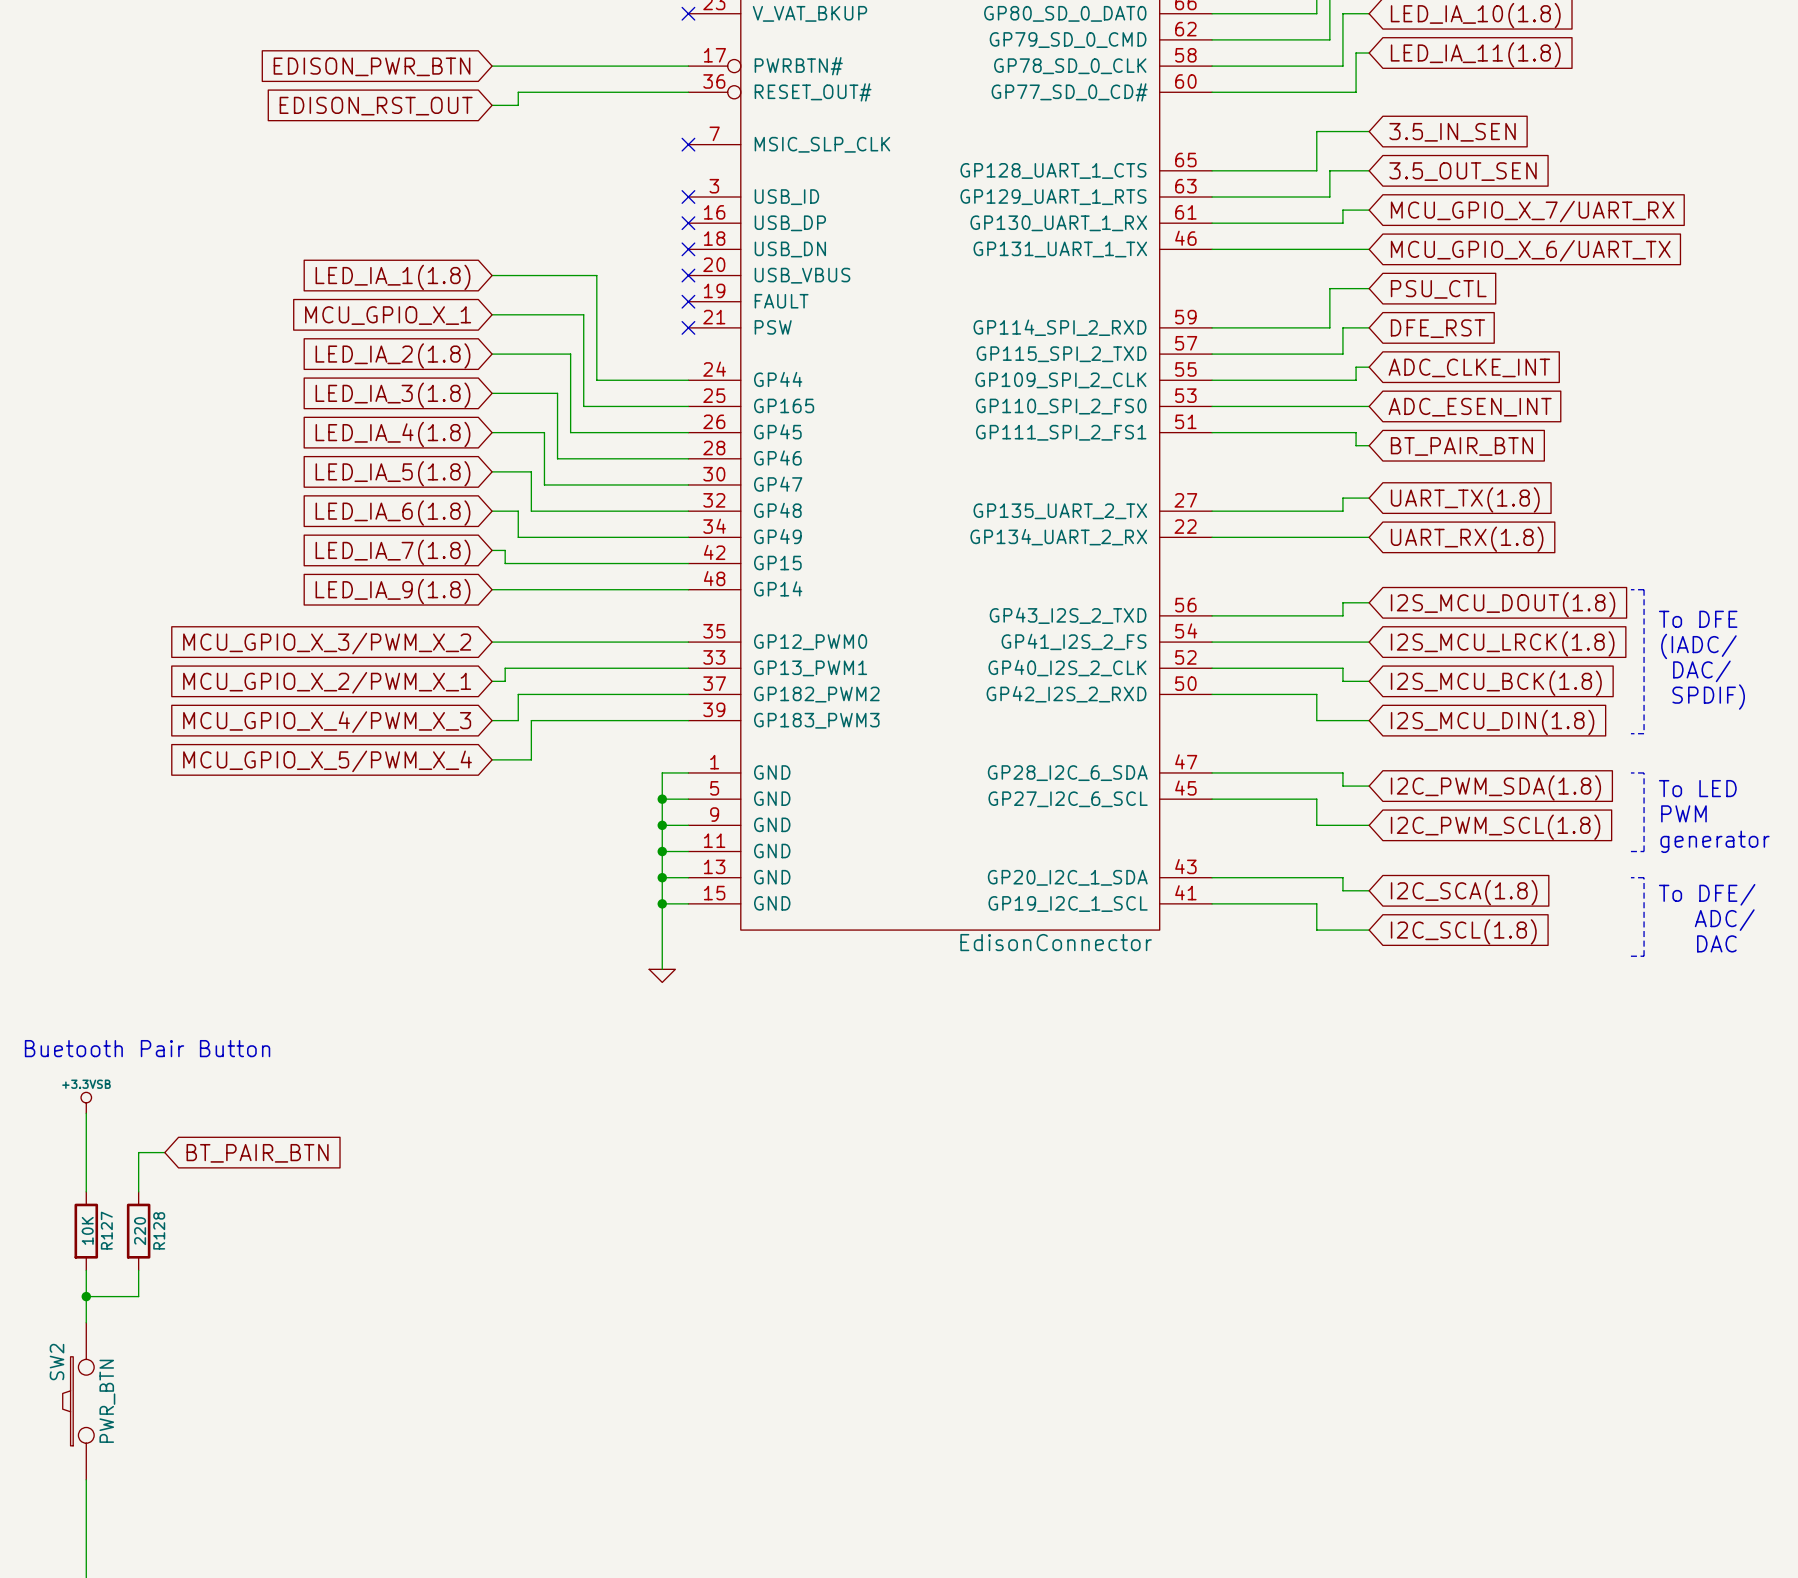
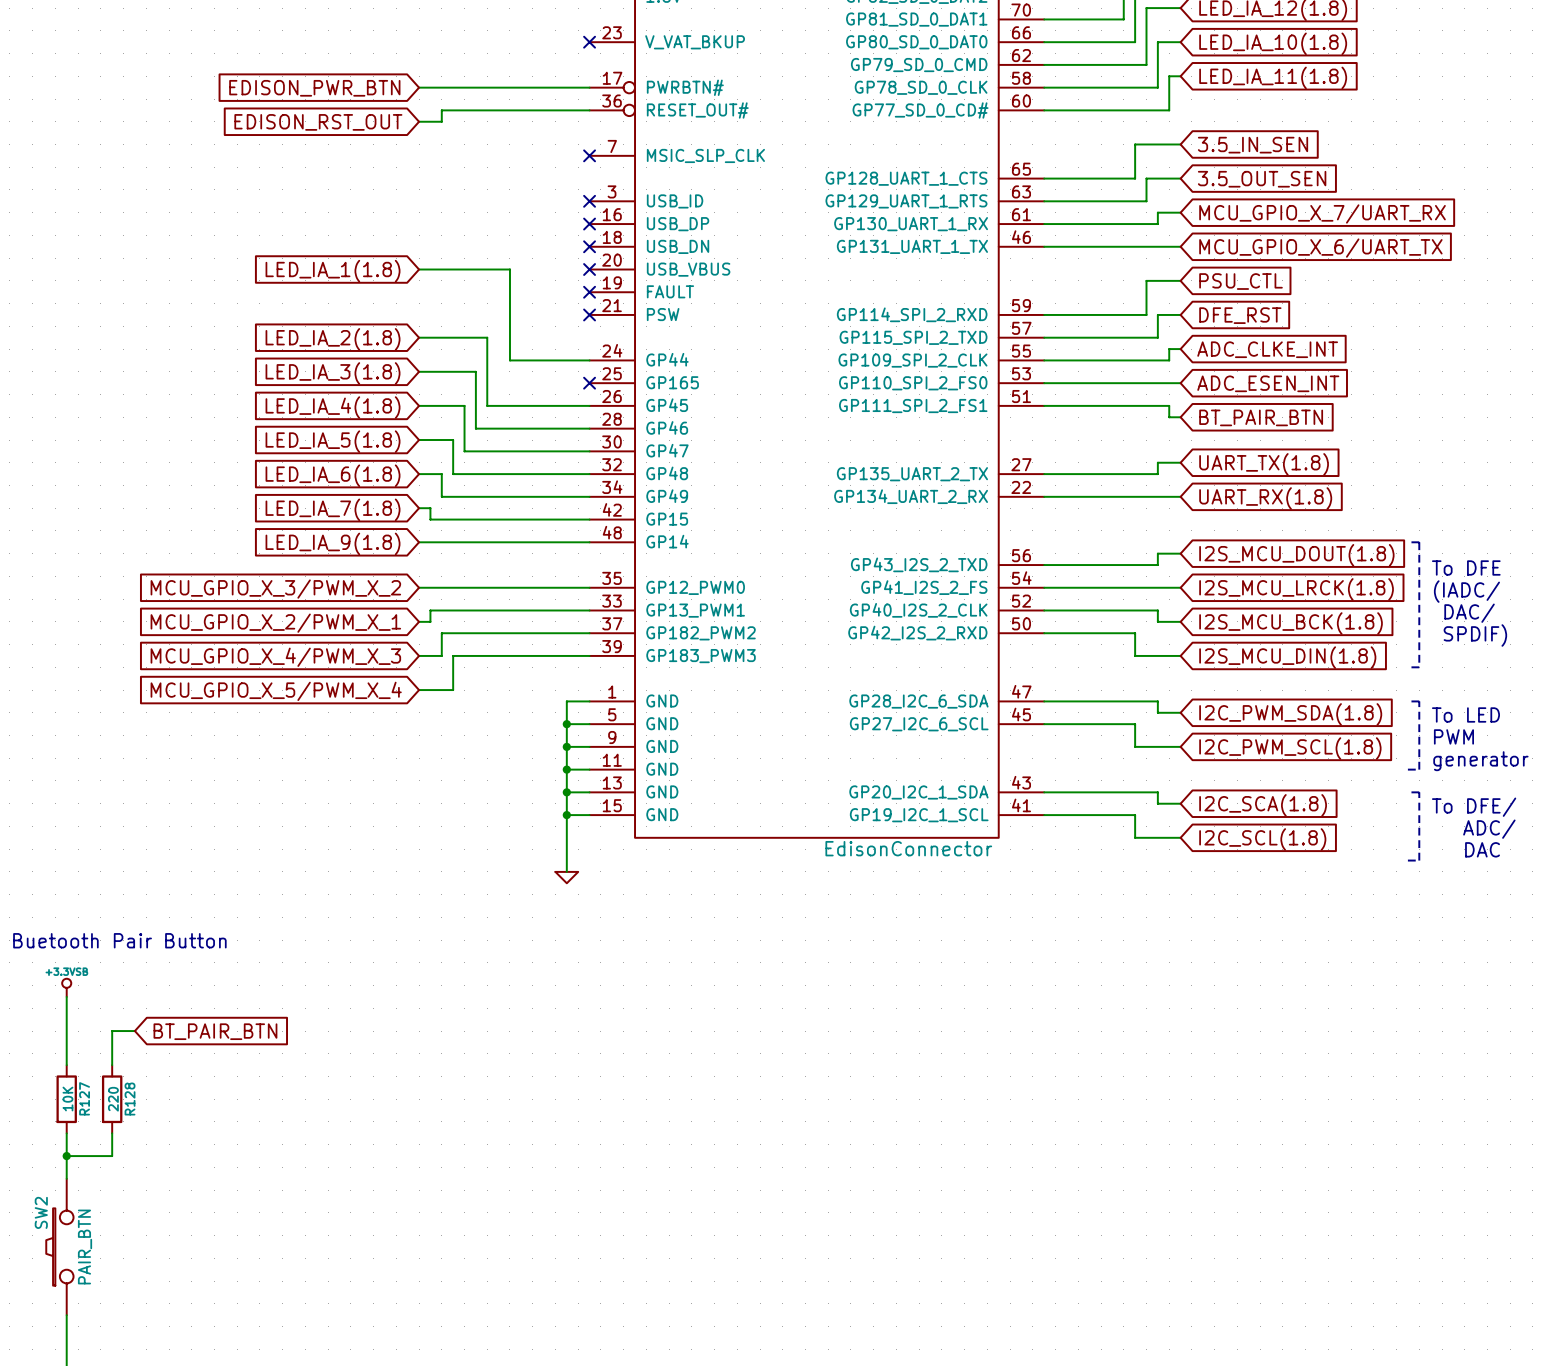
wire: (492, 314) (583, 314) (583, 406) (688, 406) -> none
global label: MCU_GPIO_X_1 (388, 315) -> none
no-connect mark: none -> (589, 383)
SW2 value: PWR_BTN (107, 1401) -> PAIR_BTN (85, 1247)

